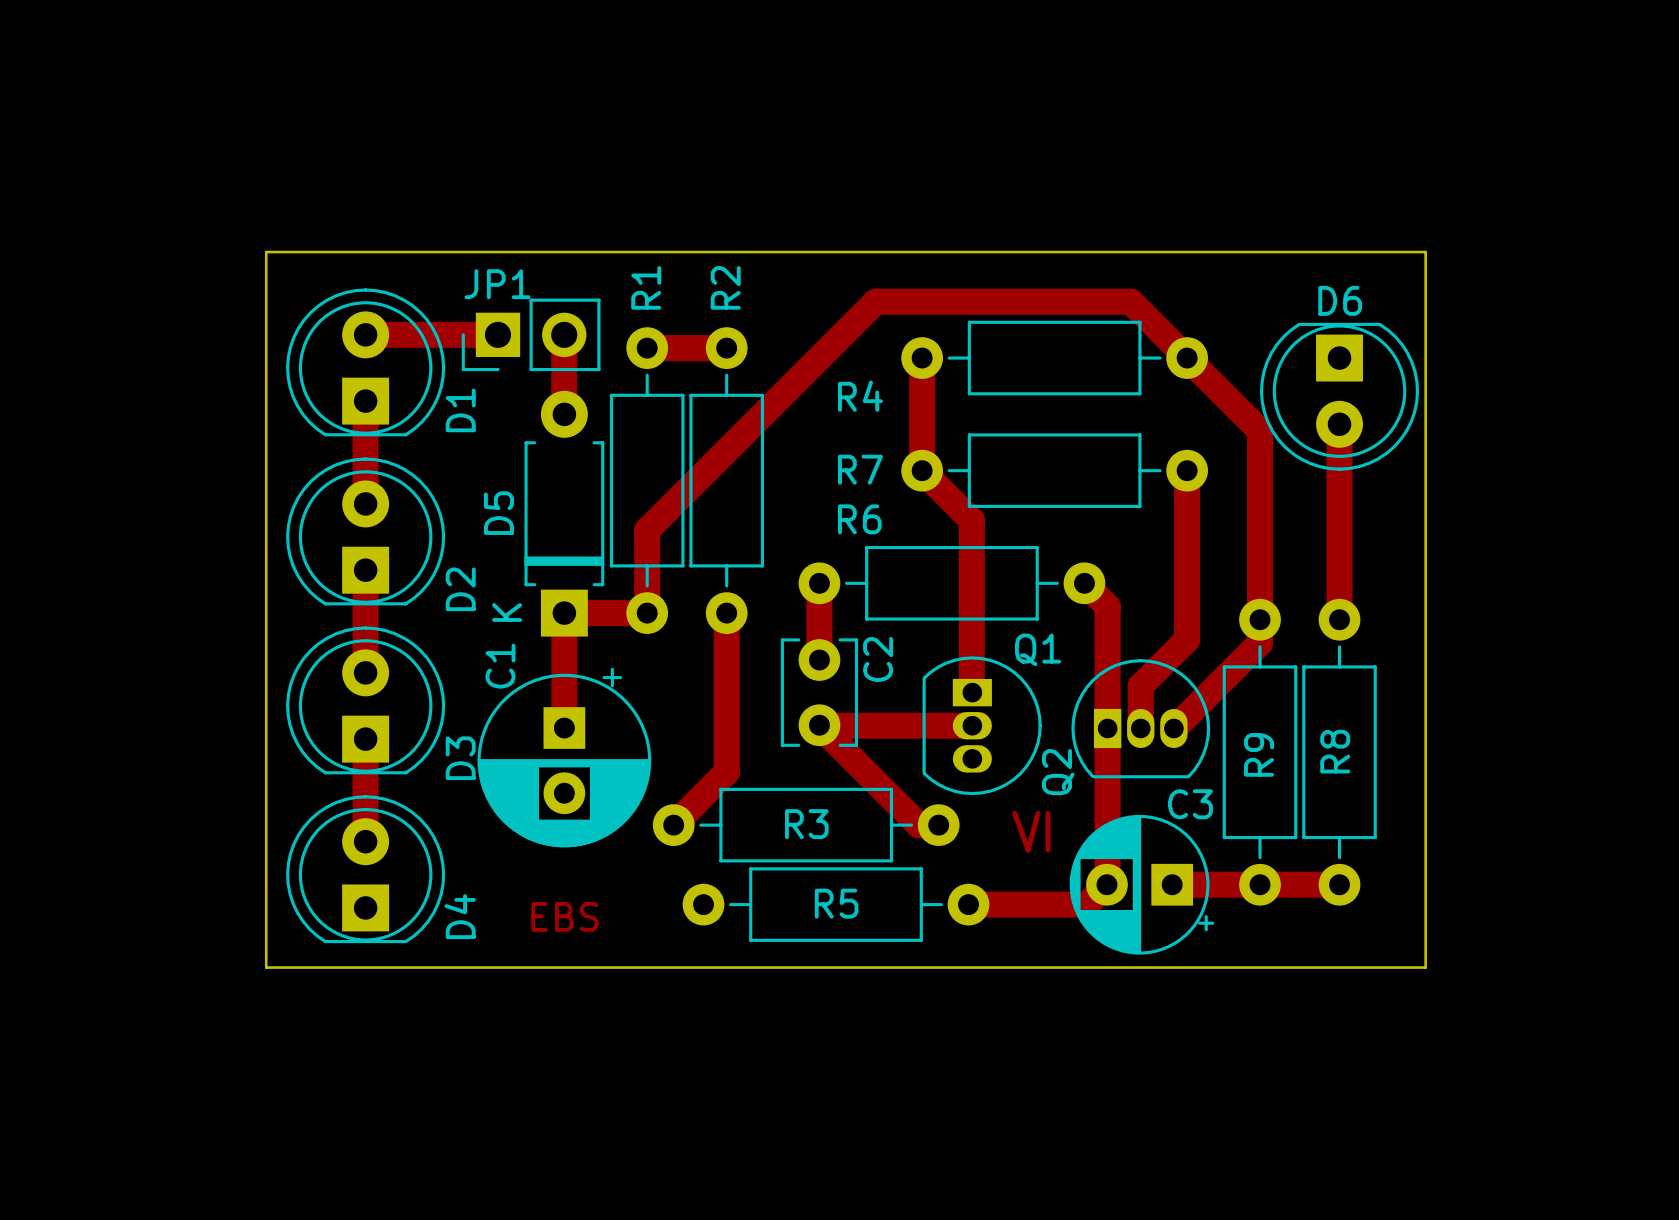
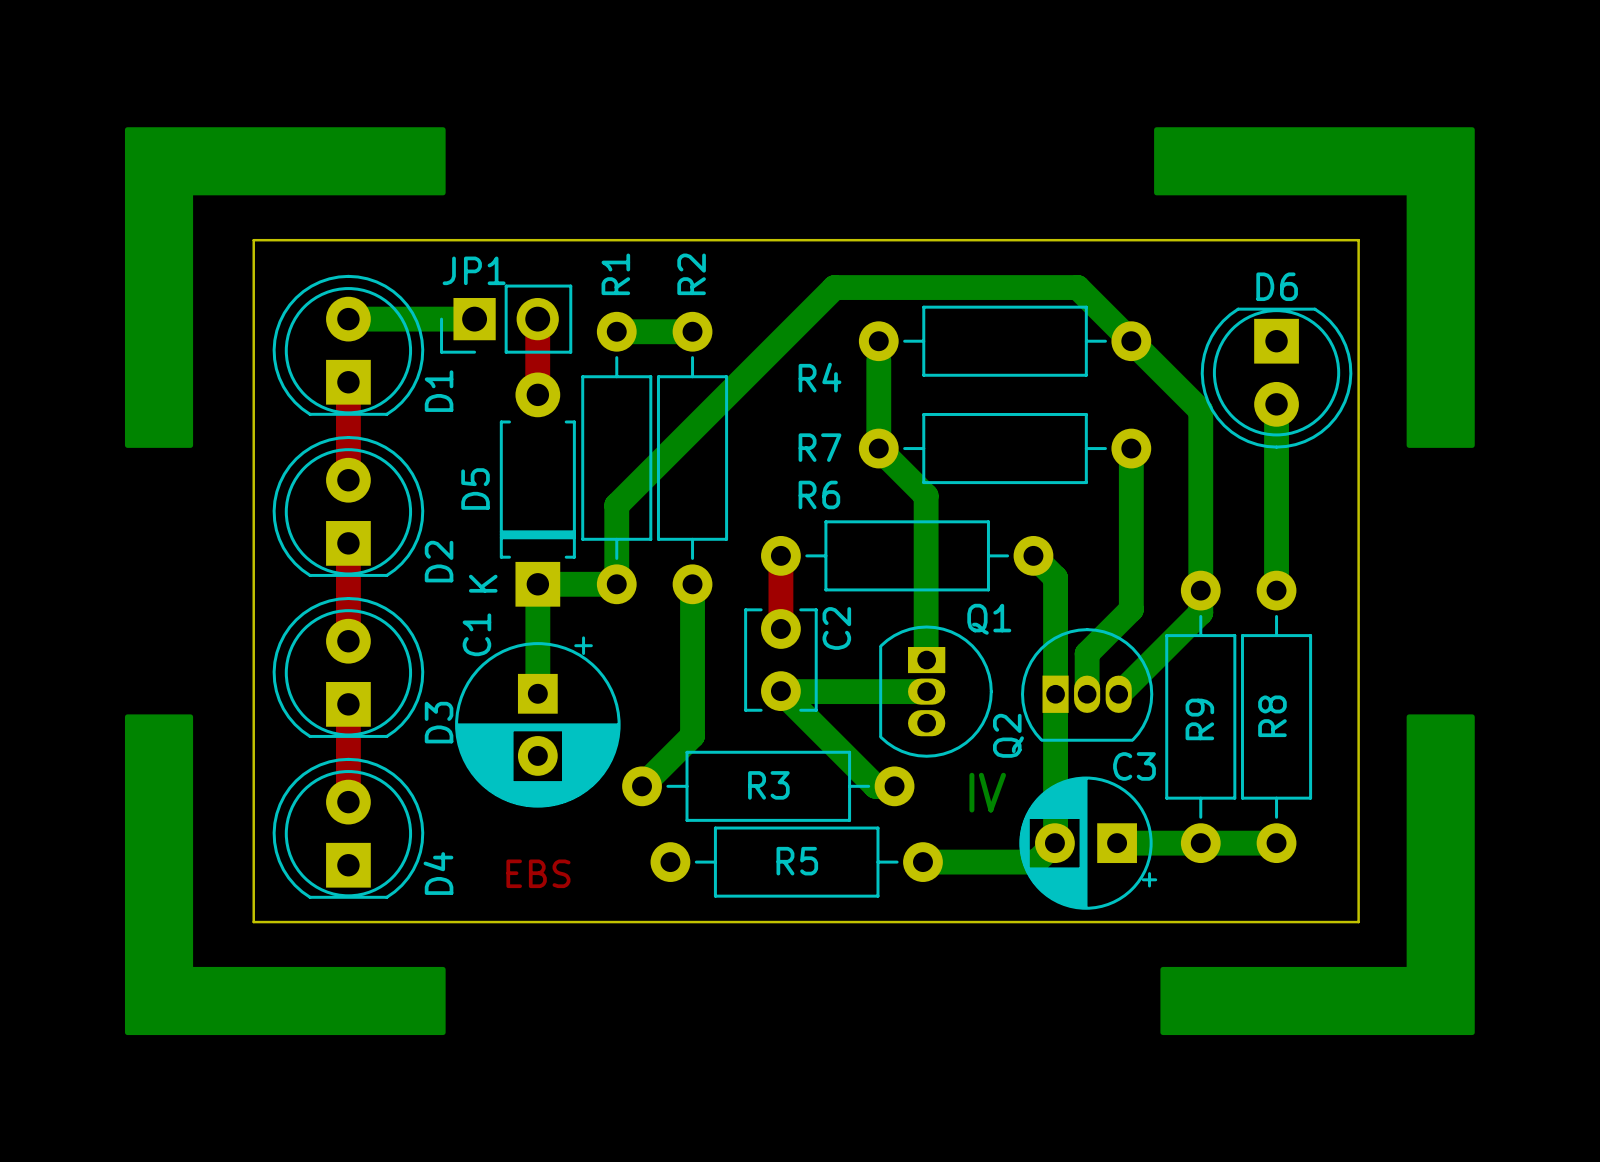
drawing: none -> [124, 127, 446, 448]
drawing: none -> [1154, 127, 1475, 448]
top track: (365, 334) (498, 334) -> none
bottom track: none -> (348, 319) (474, 319)
top track: (647, 348) (726, 348) -> none
bottom track: none -> (616, 331) (692, 331)
top track: (922, 377) (922, 470) (971, 520) (972, 692) -> none
bottom track: none -> (878, 360) (878, 448) (926, 495) (926, 660)
top track: (1339, 424) (1339, 619) -> none
bottom track: none -> (1276, 404) (1276, 590)
top track: (1187, 470) (1187, 639) (1140, 685) (1140, 728) -> none
bottom track: none -> (1131, 448) (1131, 609) (1087, 653) (1087, 694)
top track: (1084, 583) (1107, 606) (1107, 884) (1087, 904) (968, 904) -> none
bottom track: none -> (1033, 555) (1055, 577) (1055, 842) (1036, 862) (922, 862)
top track: (726, 613) (726, 772) (673, 825) -> none
bottom track: none -> (692, 584) (692, 735) (642, 786)
top track: (819, 725) (972, 725) -> none
top track: (819, 725) (918, 825) (938, 825) -> none
bottom track: none -> (780, 691) (926, 691)
bottom track: none -> (780, 691) (875, 786) (894, 786)
top track: (564, 728) (564, 613) (643, 613) (647, 609) (647, 530) (875, 301) (1130, 301) (1260, 430) (1260, 642) (1173, 728) -> none
bottom track: none -> (537, 693) (537, 584) (613, 584) (616, 581) (616, 505) (834, 287) (1077, 287) (1200, 410) (1200, 612) (1118, 694)
drawing: none -> [124, 714, 446, 1036]
drawing: none -> [1160, 714, 1475, 1036]
top track: (1014, 813) (1028, 849) (1038, 813) -> none
bottom track: none -> (971, 775) (971, 810)
bottom track: none -> (981, 775) (990, 810) (1003, 775)
top track: (1048, 813) (1048, 849) -> none
top track: (1172, 884) (1339, 884) -> none
bottom track: none -> (1117, 843) (1276, 843)

